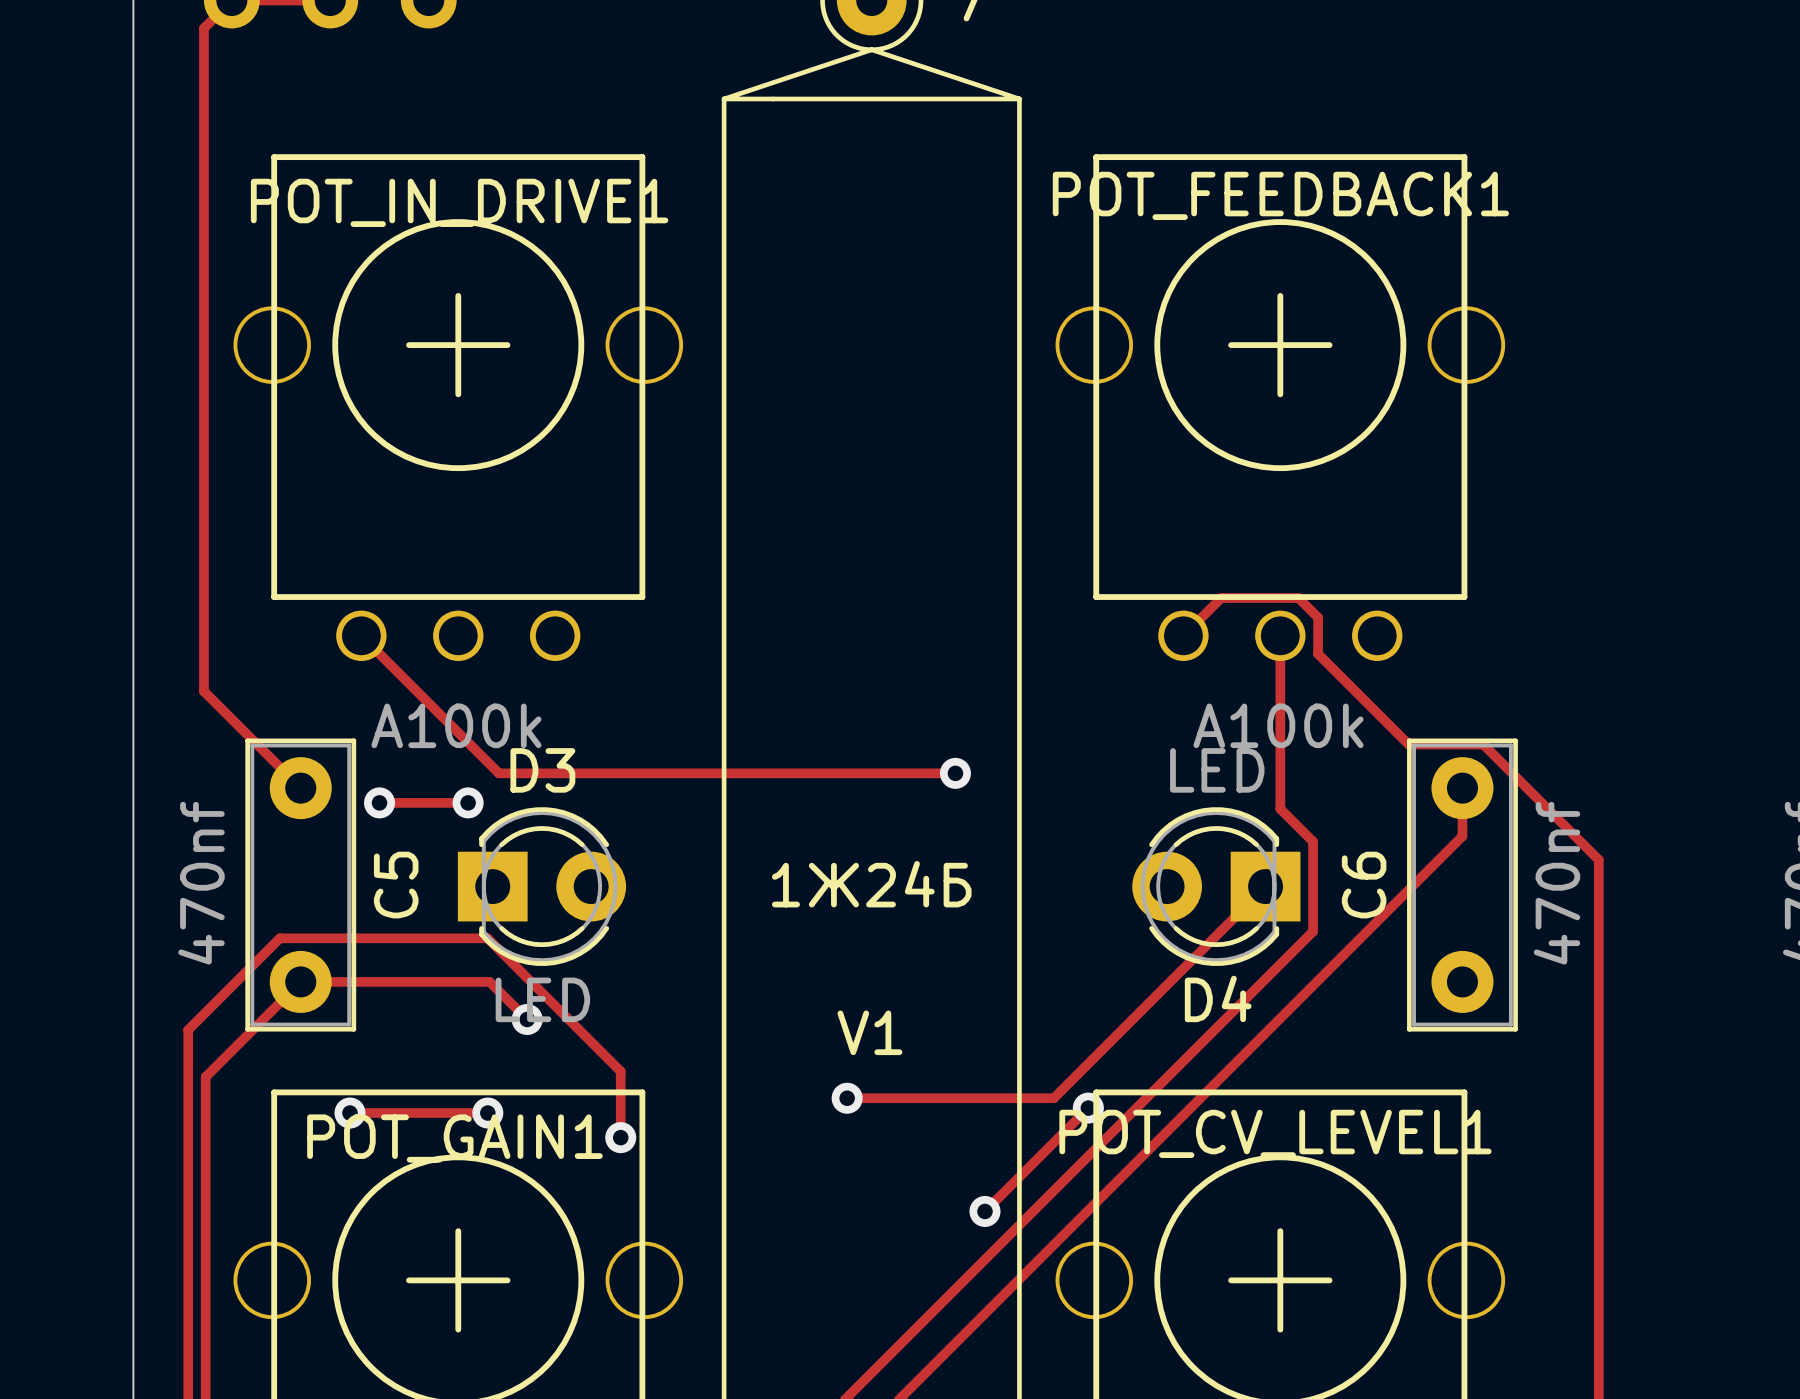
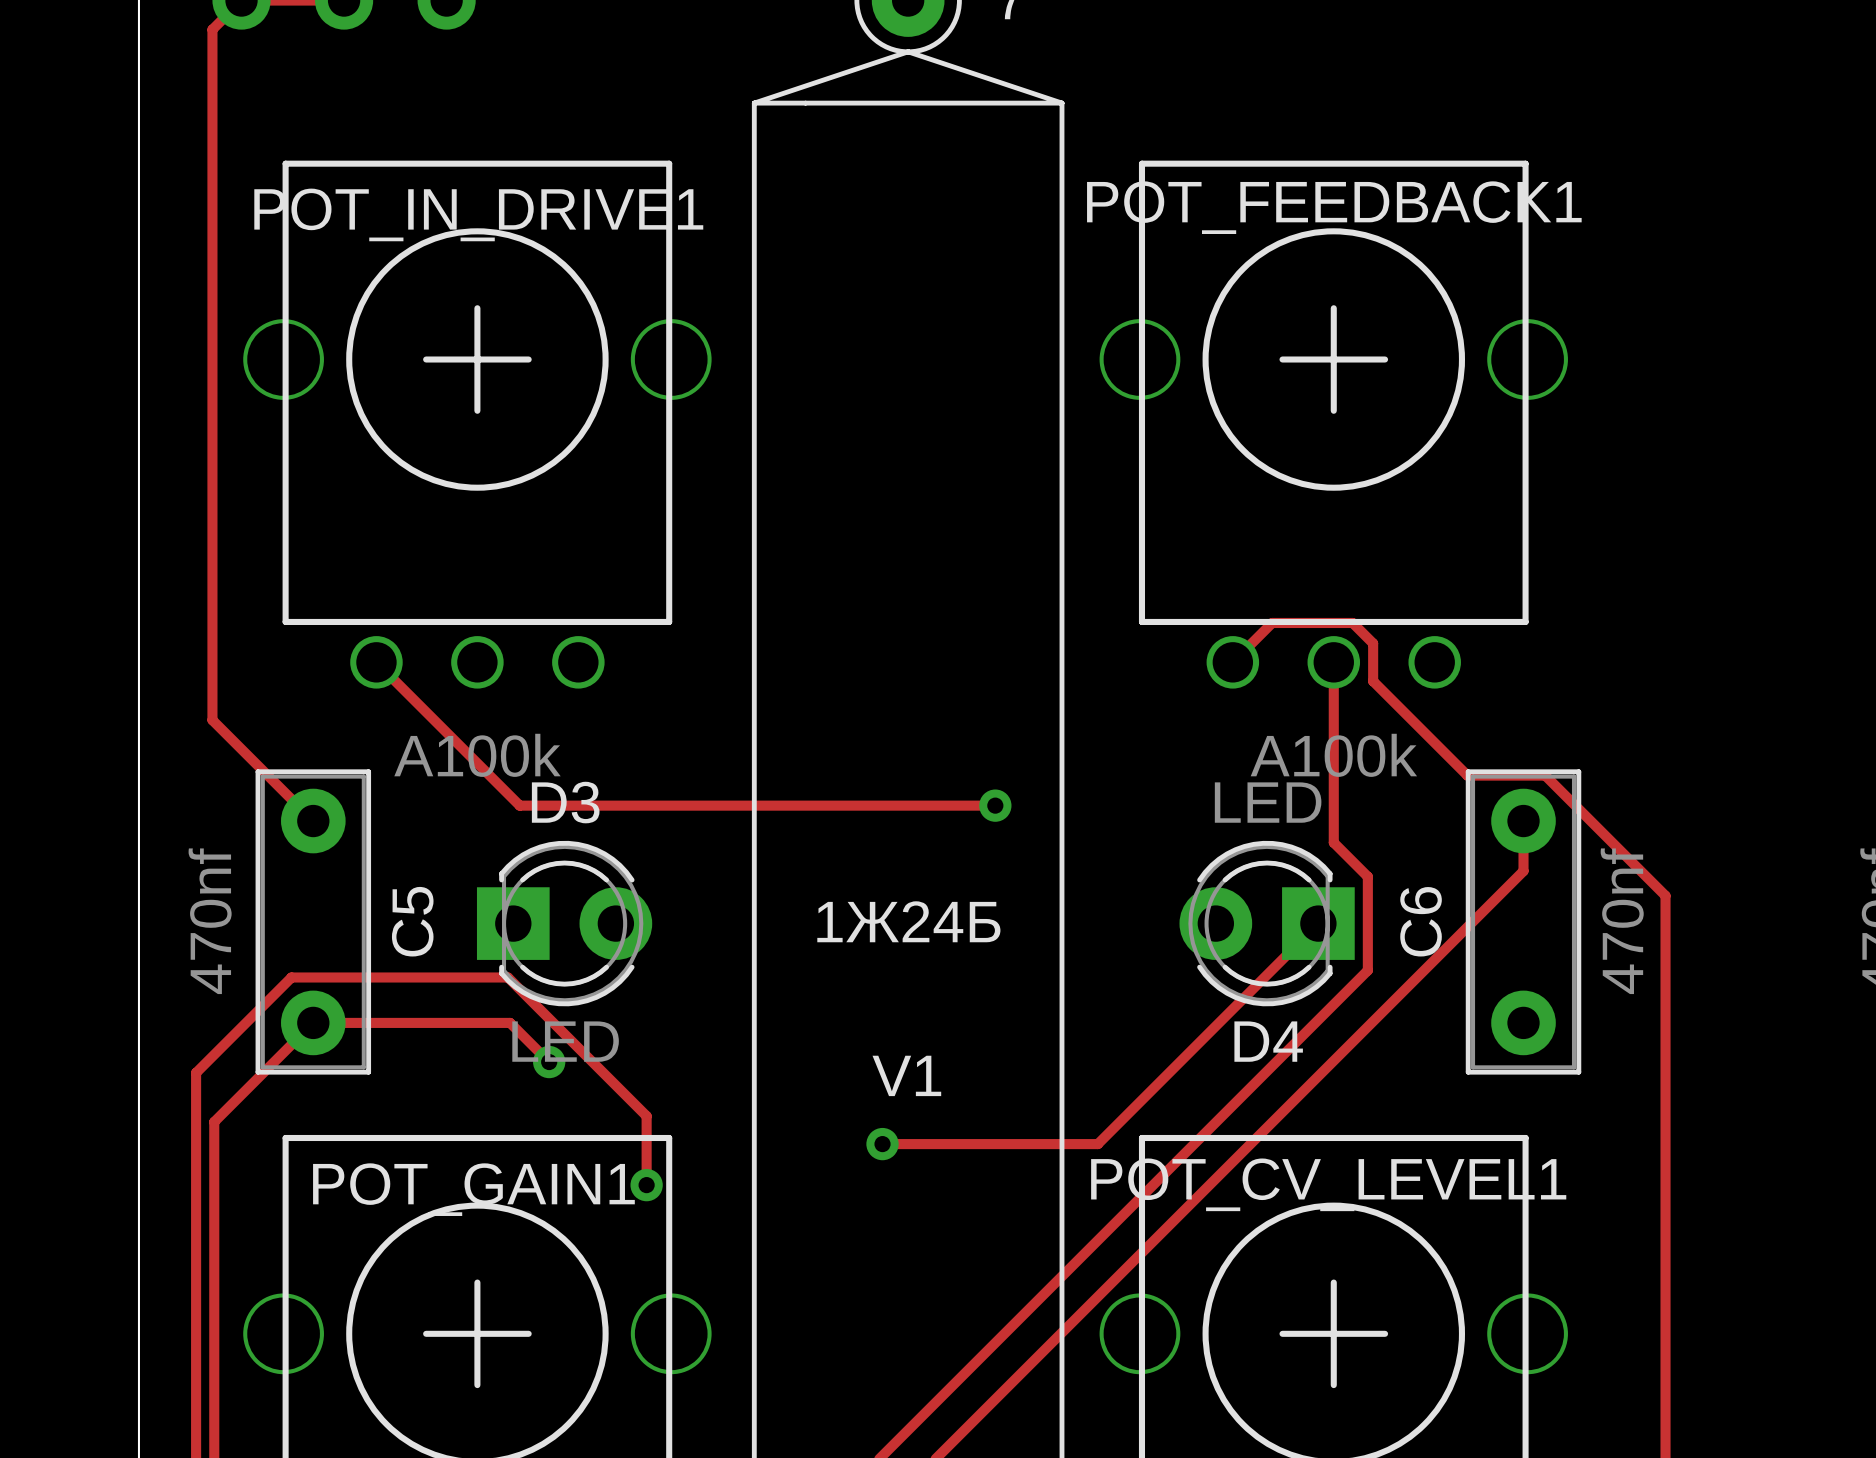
track: (379, 802) (468, 802) -> none
via: (379, 802) -> none
via: (468, 802) -> none
track: (1088, 1108) (984, 1211) -> none
via: (1088, 1108) -> none
track: (349, 1113) (487, 1113) -> none
via: (349, 1113) -> none
via: (487, 1113) -> none
via: (984, 1211) -> none

